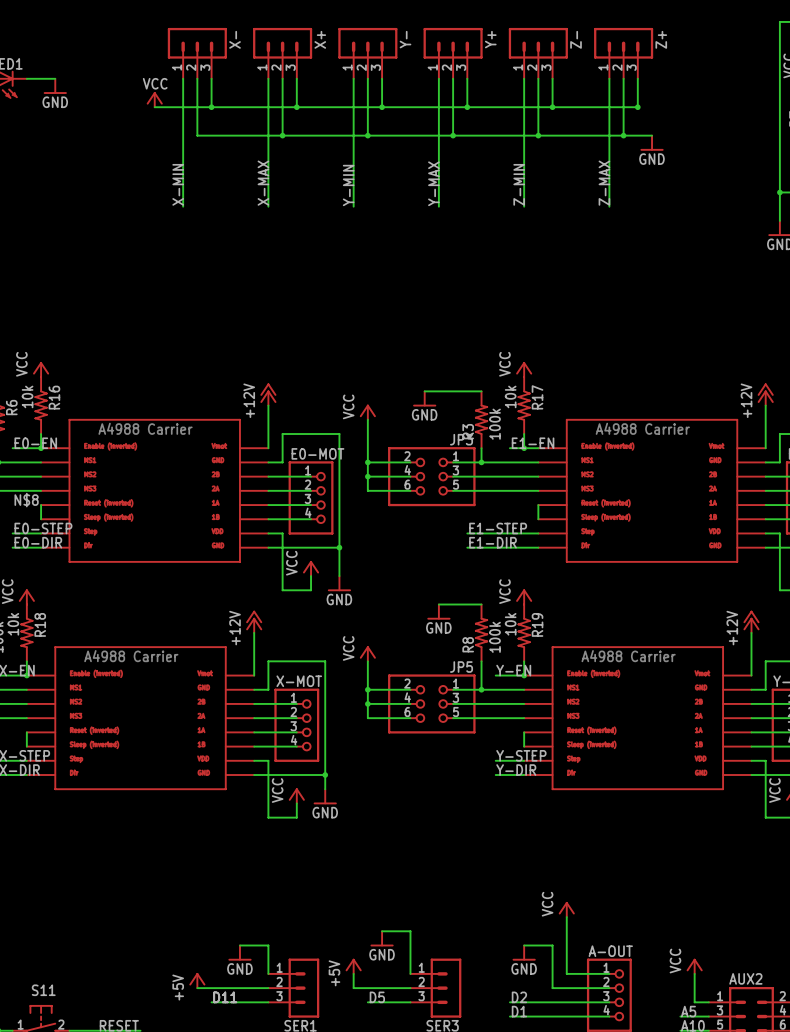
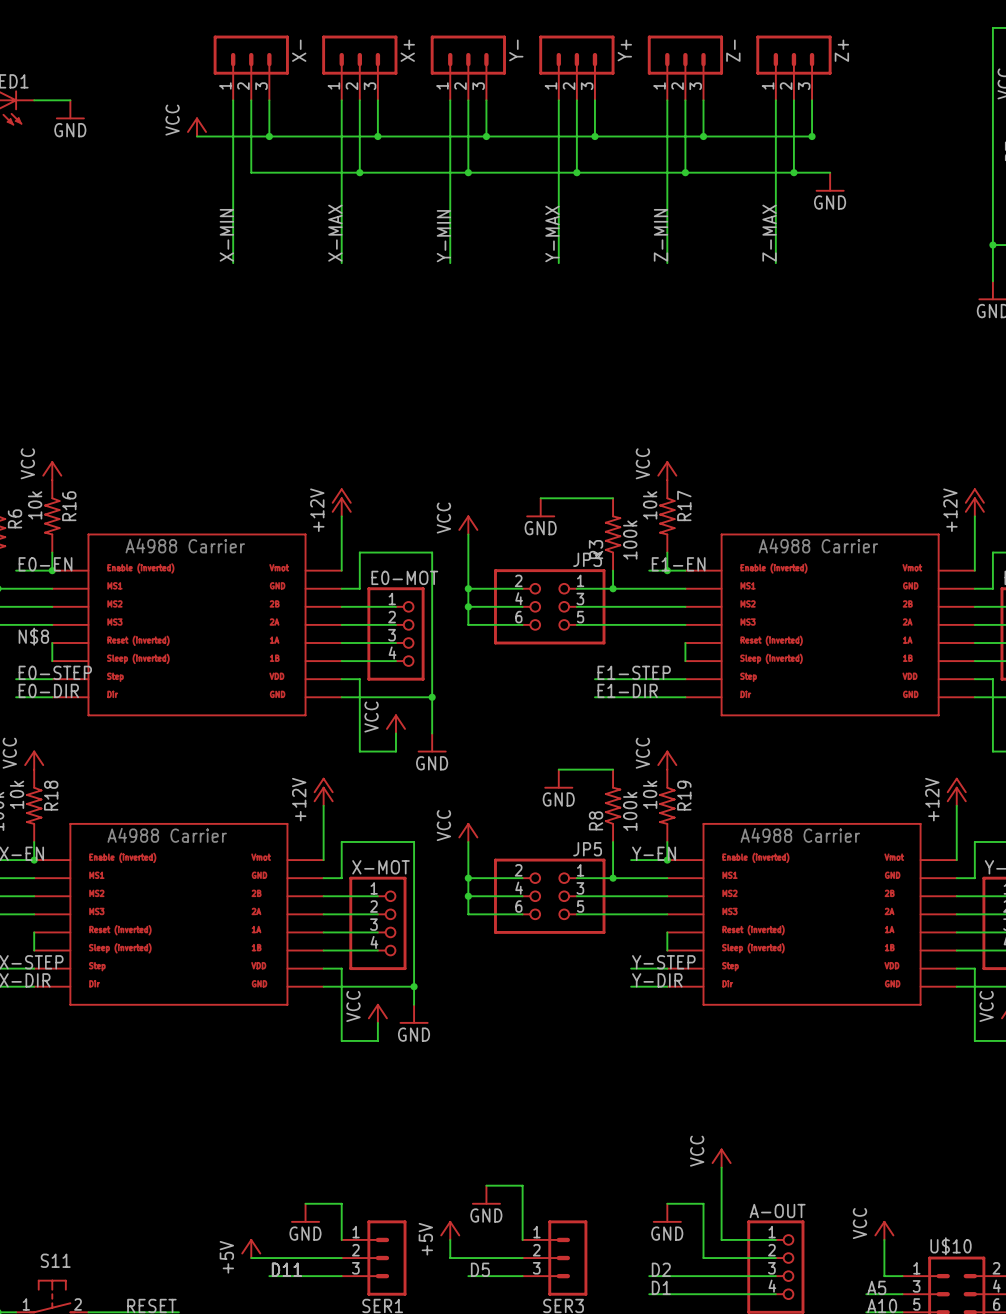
power symbol text rotation: 0° (155, 83) -> 90° counterclockwise (172, 120)
AUX2 name: AUX2 (745, 978) -> U$10 (951, 1246)

